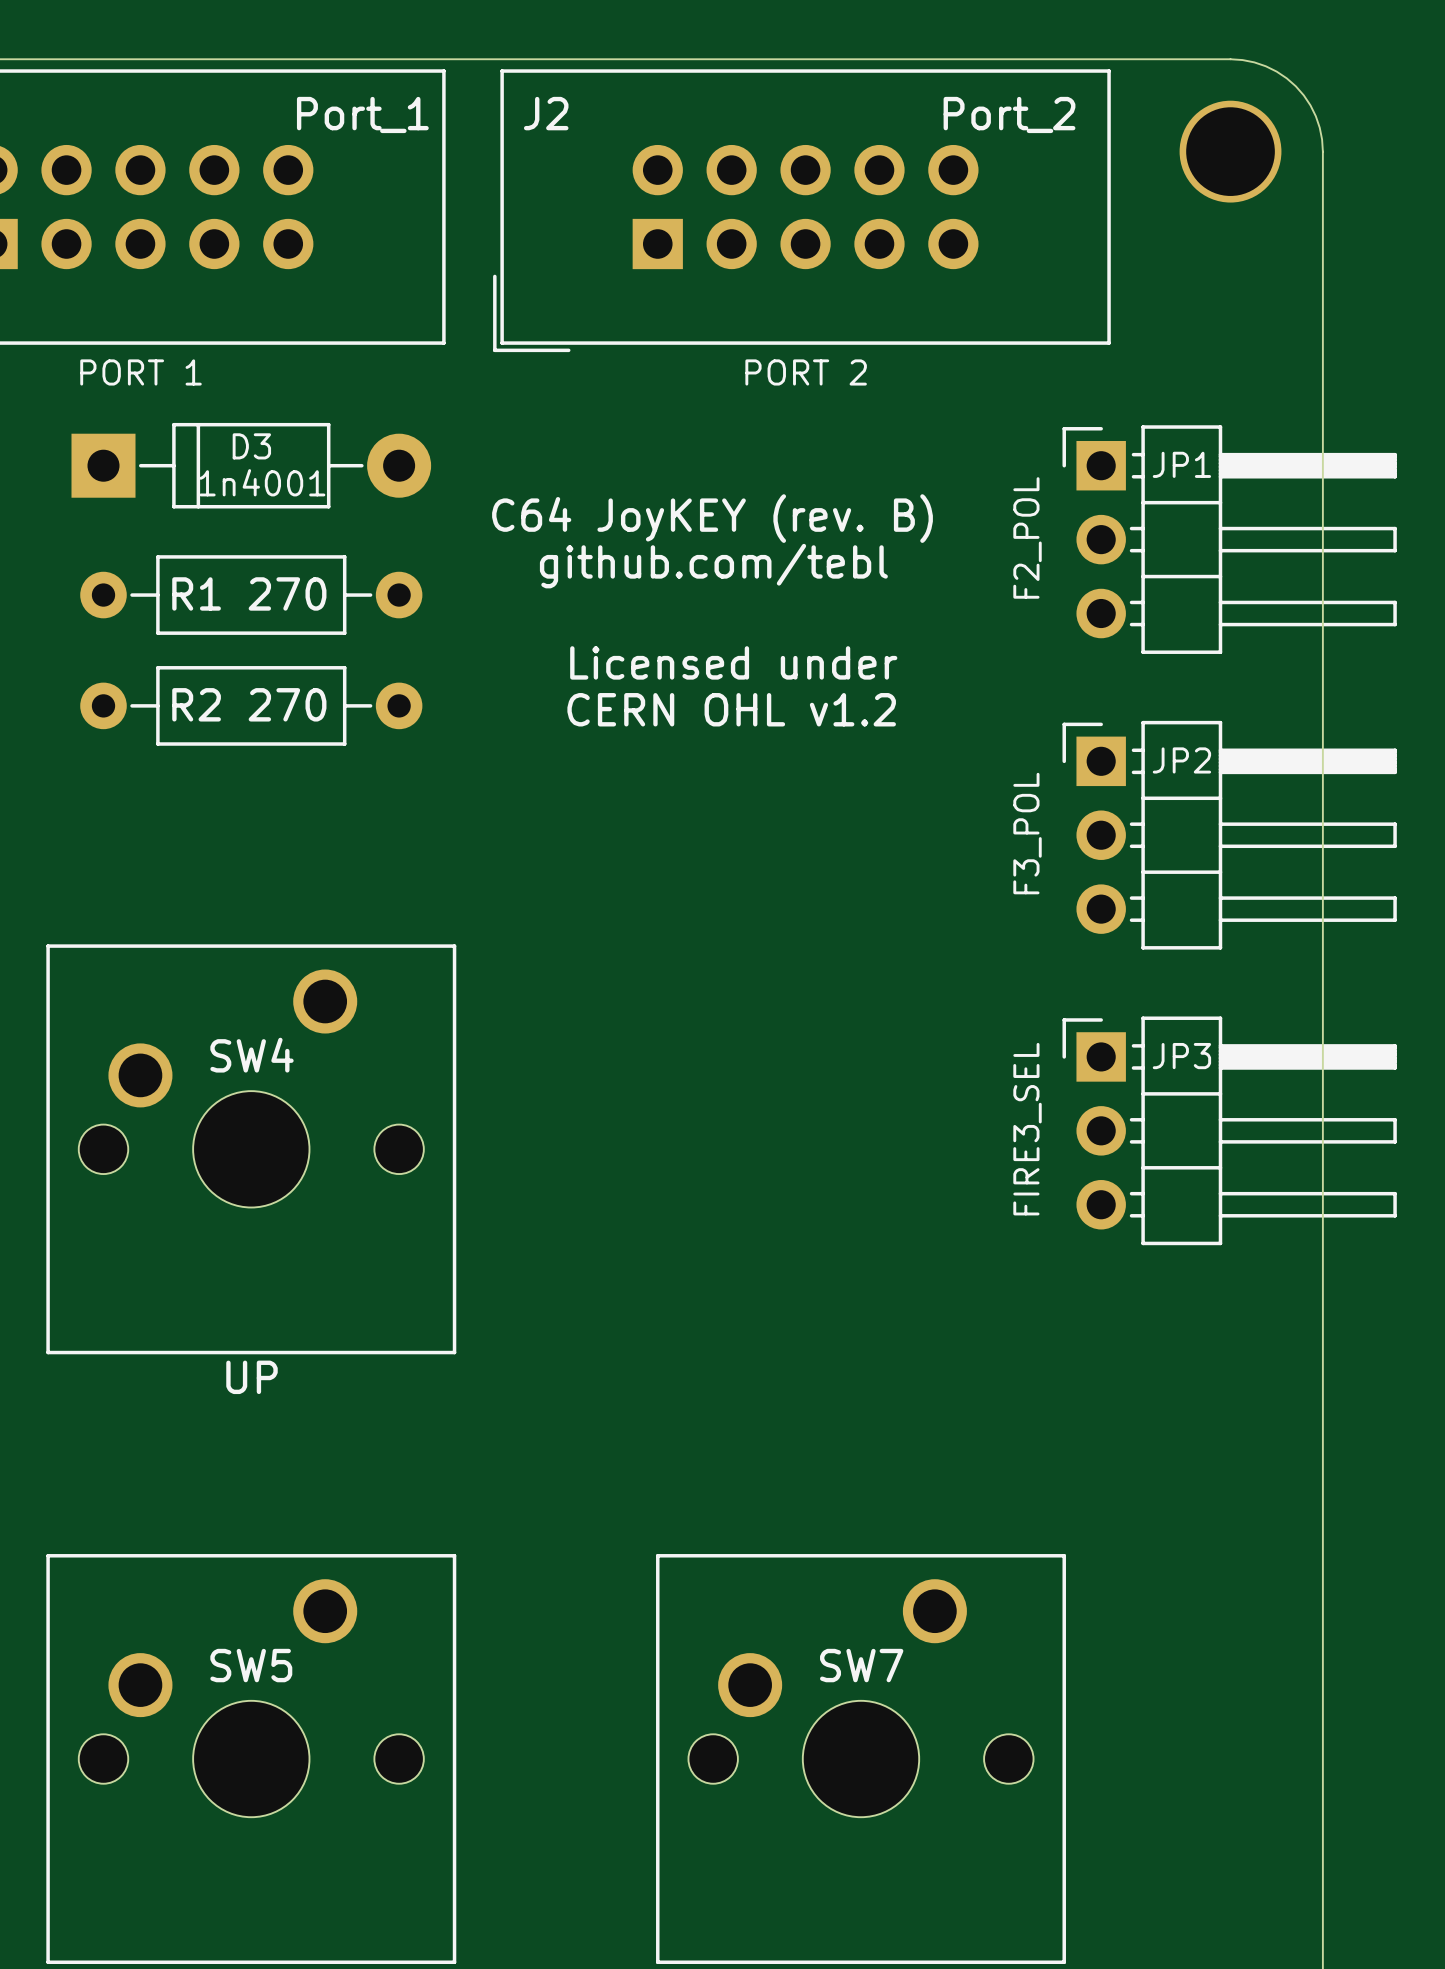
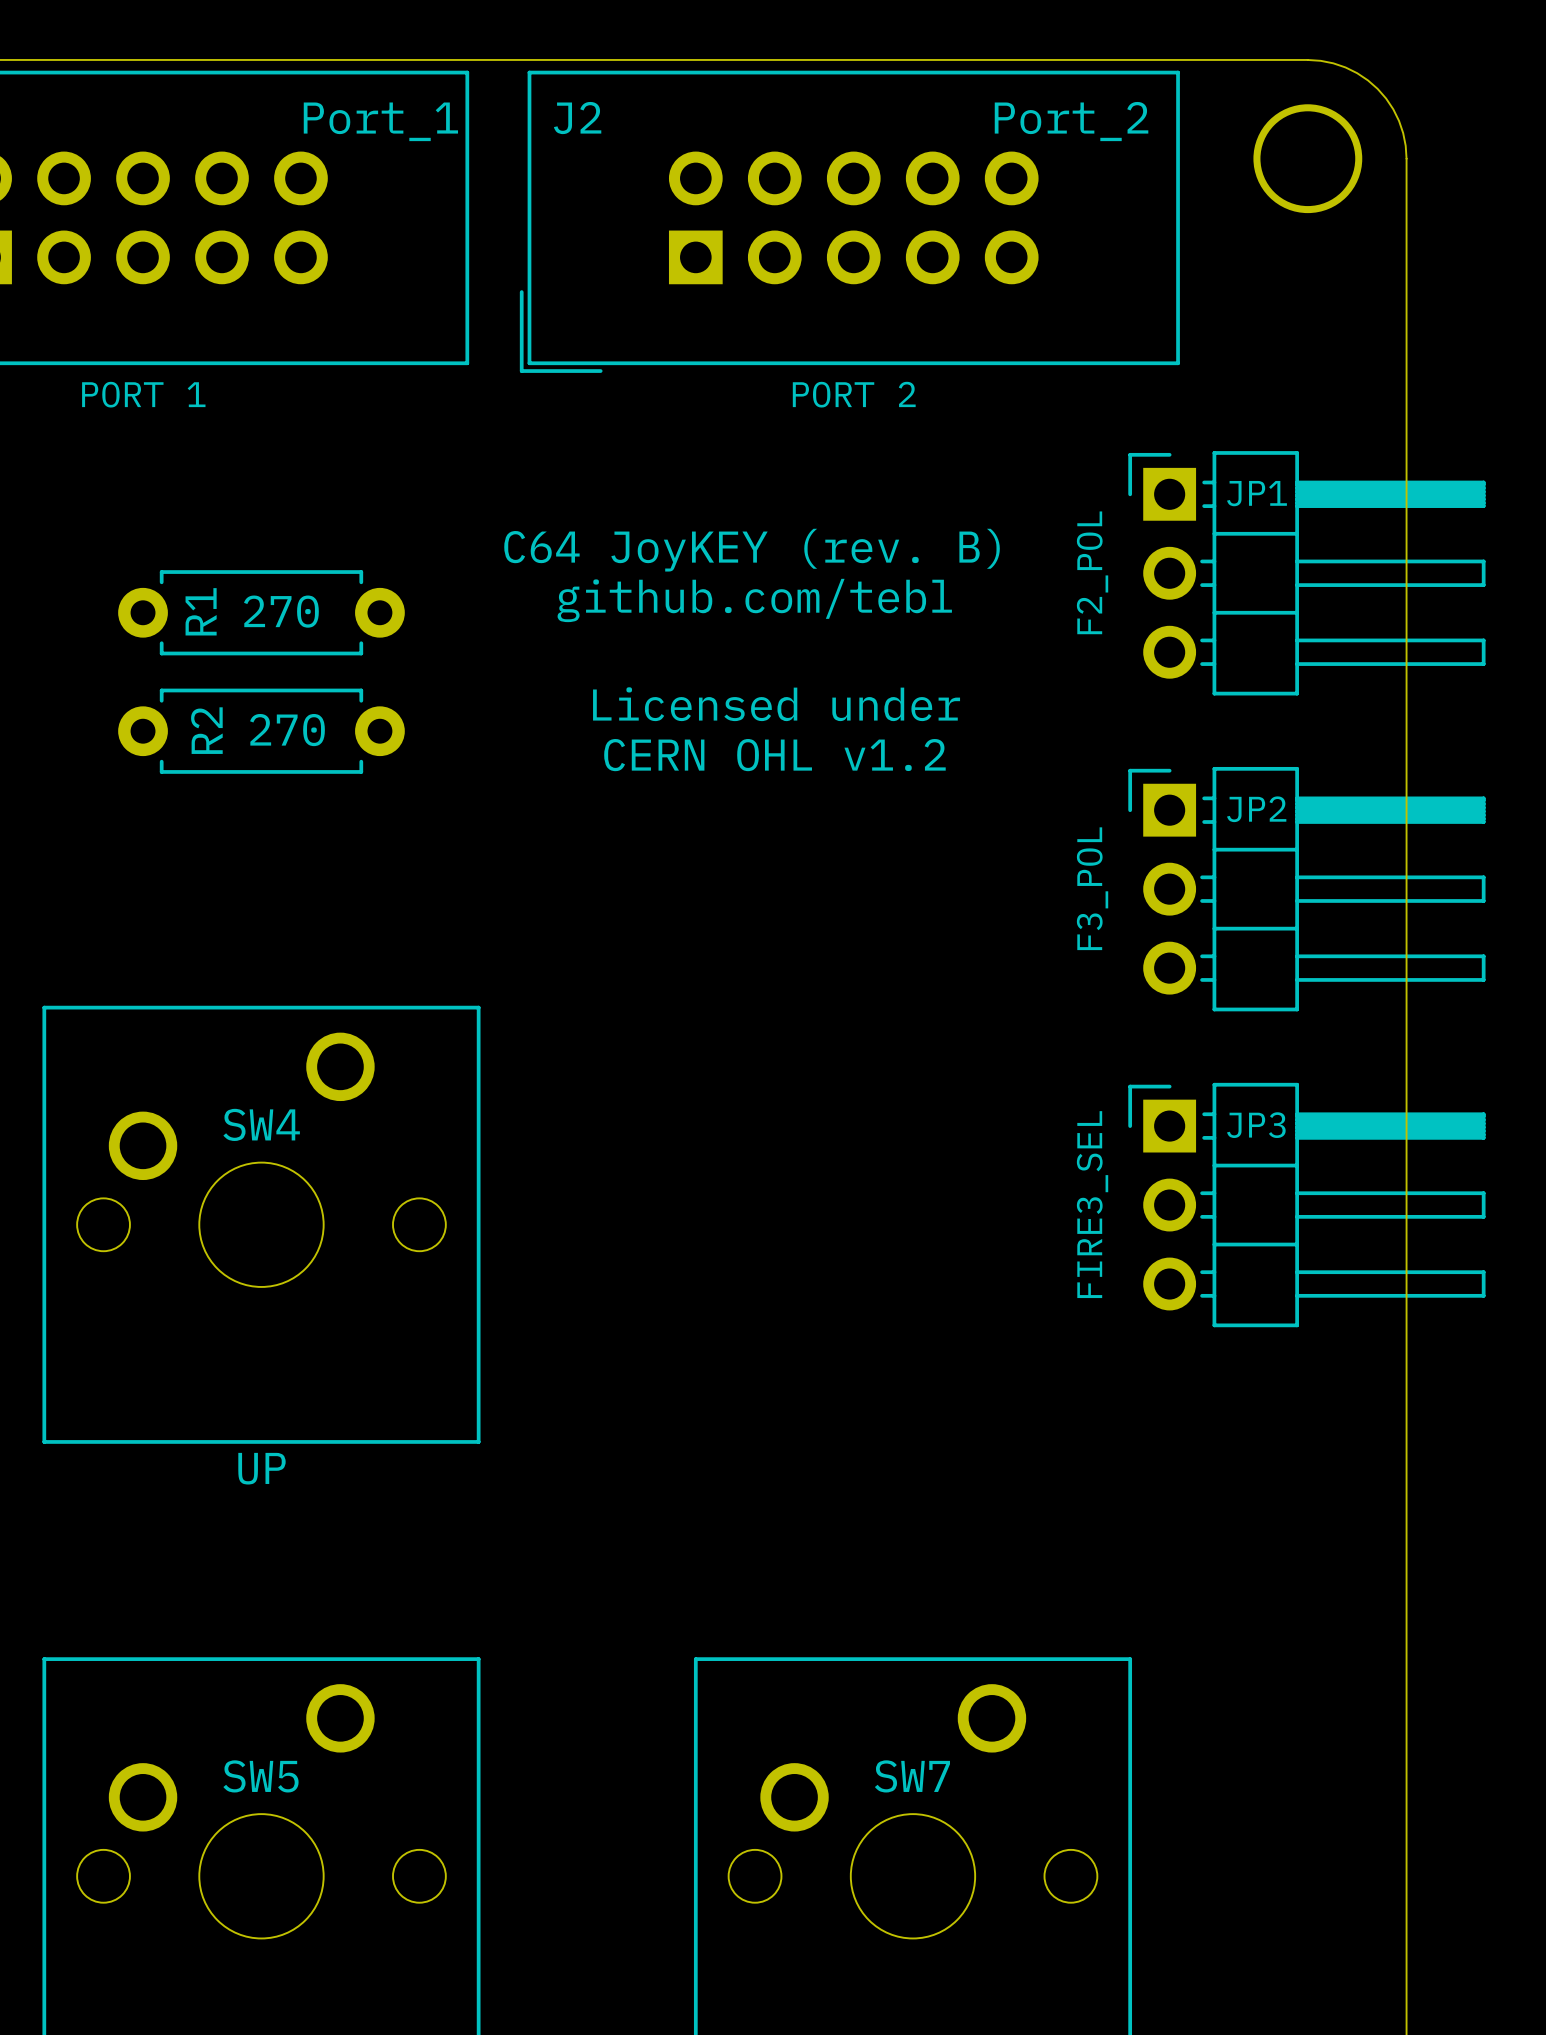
D3: 1n4001 (251, 465) -> none
R1 footprint: [80, 555, 423, 635] -> [118, 570, 405, 656]
R2 footprint: [80, 666, 423, 746] -> [118, 688, 405, 774]

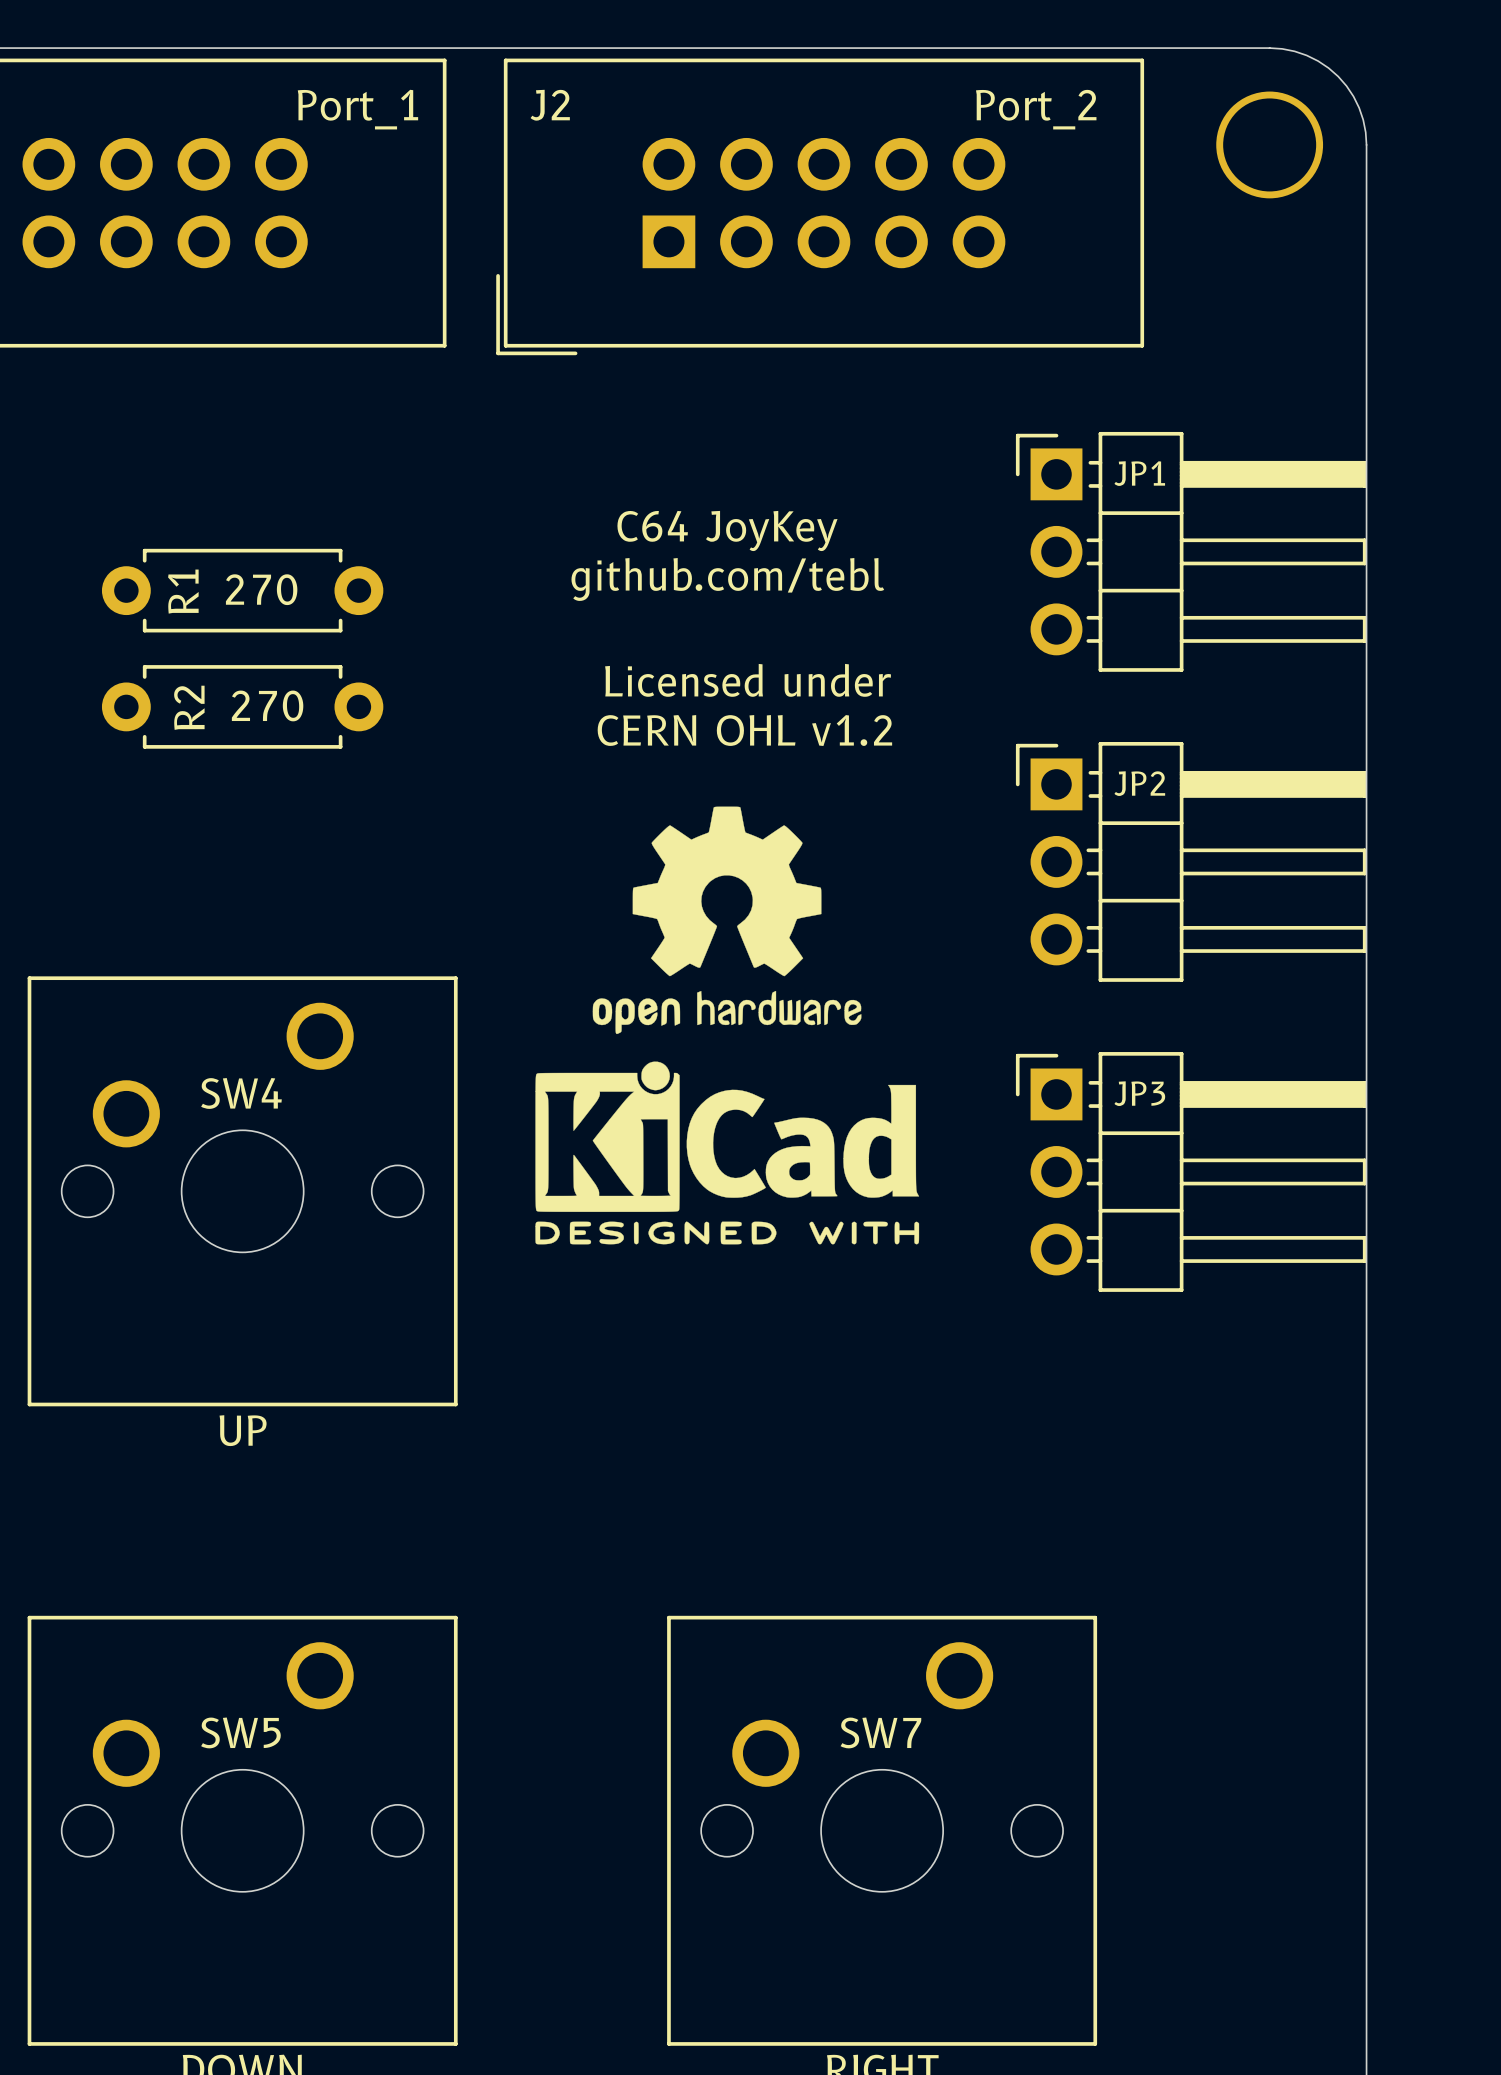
text: PORT 1 (143, 394) -> none
text: PORT 2 (854, 394) -> none
text: C64 JoyKEY (rev. B) (752, 550) -> C64 JoyKey (727, 530)
JP1 value: F2_POL (1092, 572) -> none
JP1 position: (1306, 573) -> (1191, 551)
drawing: none -> [535, 806, 920, 1245]
JP2 value: F3_POL (1092, 888) -> none
JP2 position: (1306, 889) -> (1191, 861)
JP3 value: FIRE3_SEL (1092, 1204) -> none
JP3 position: (1306, 1205) -> (1191, 1171)

